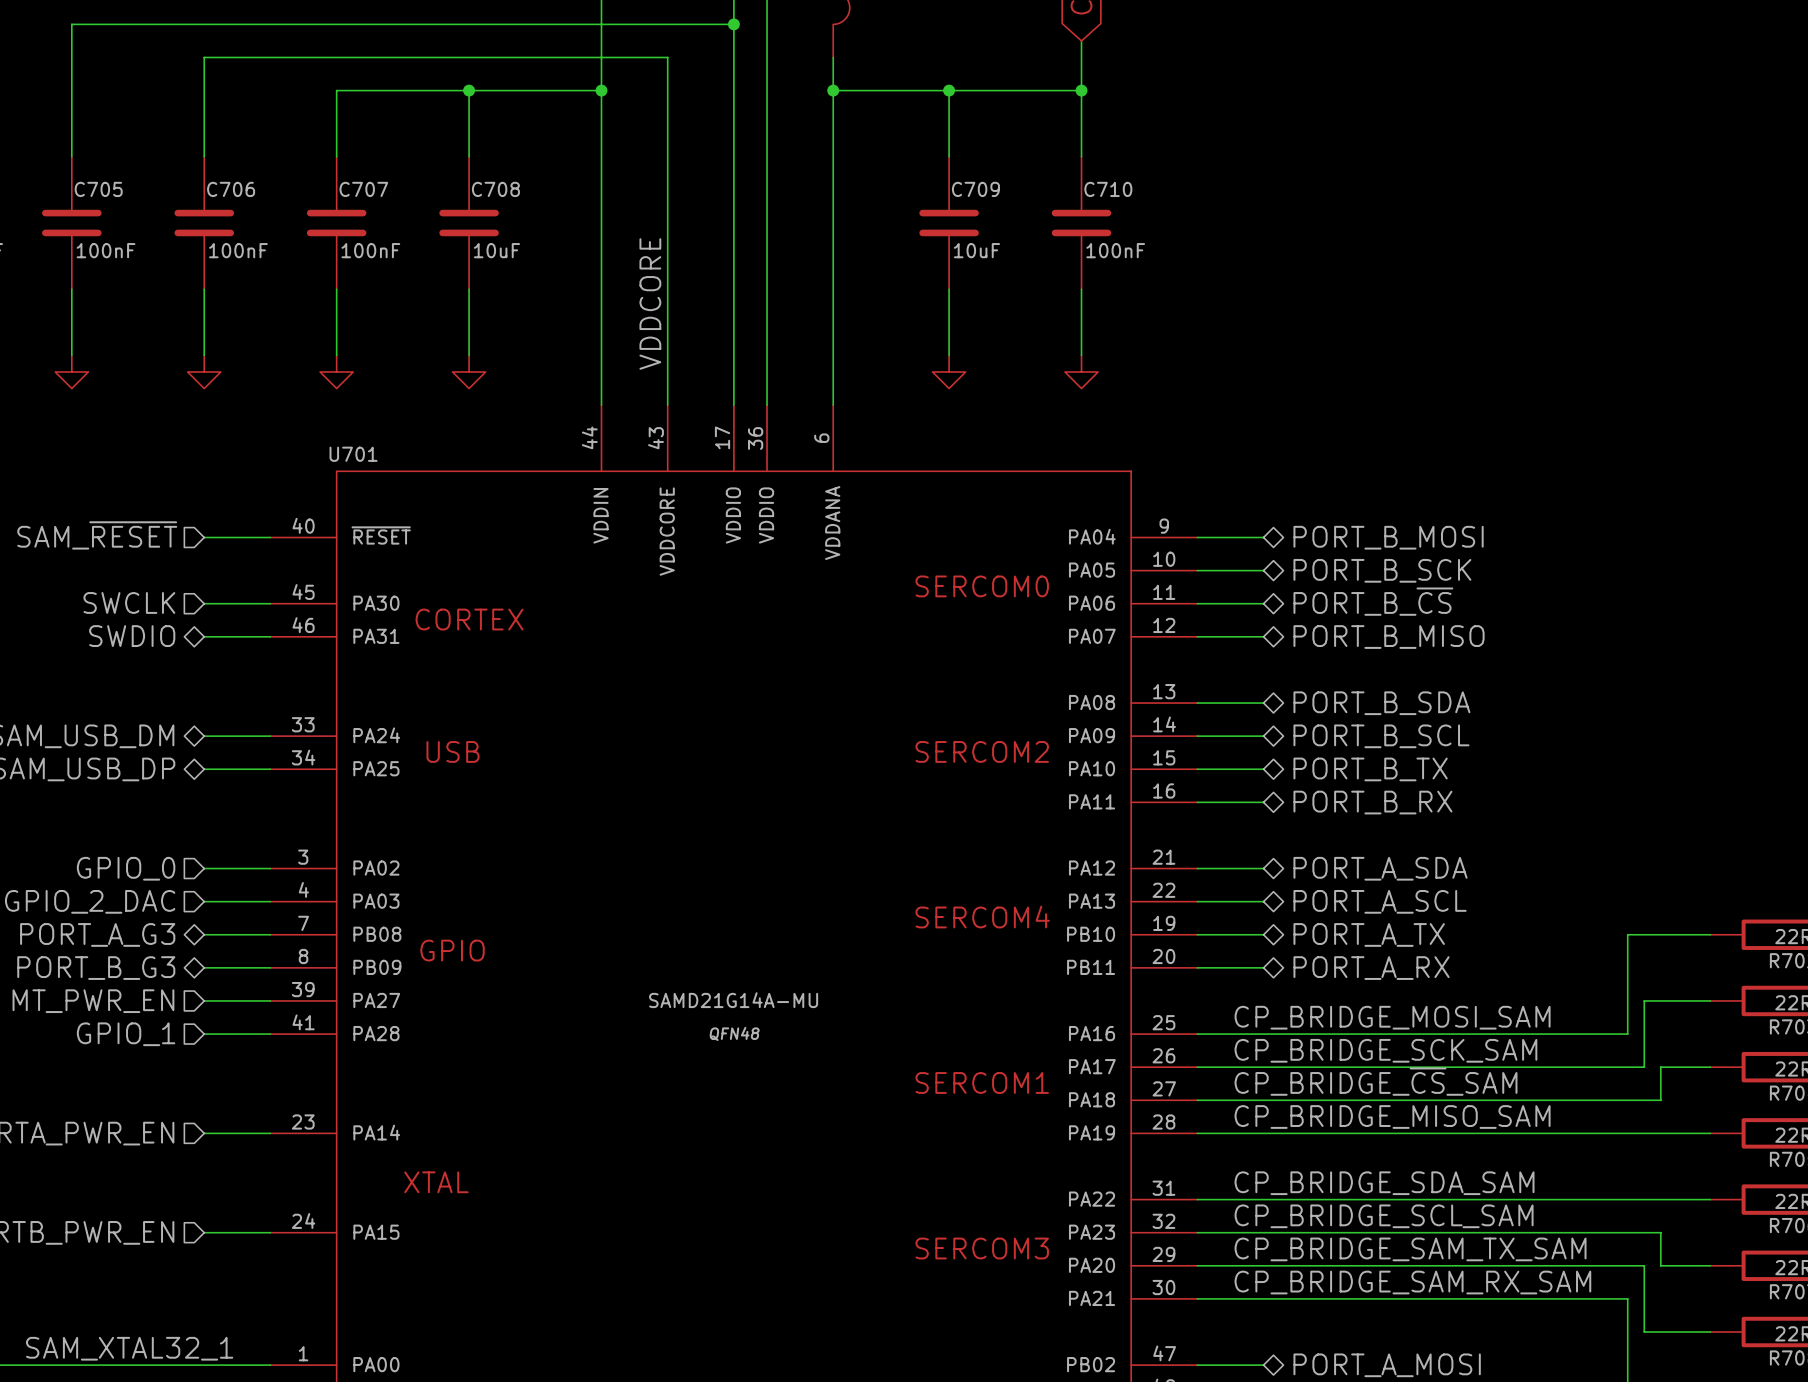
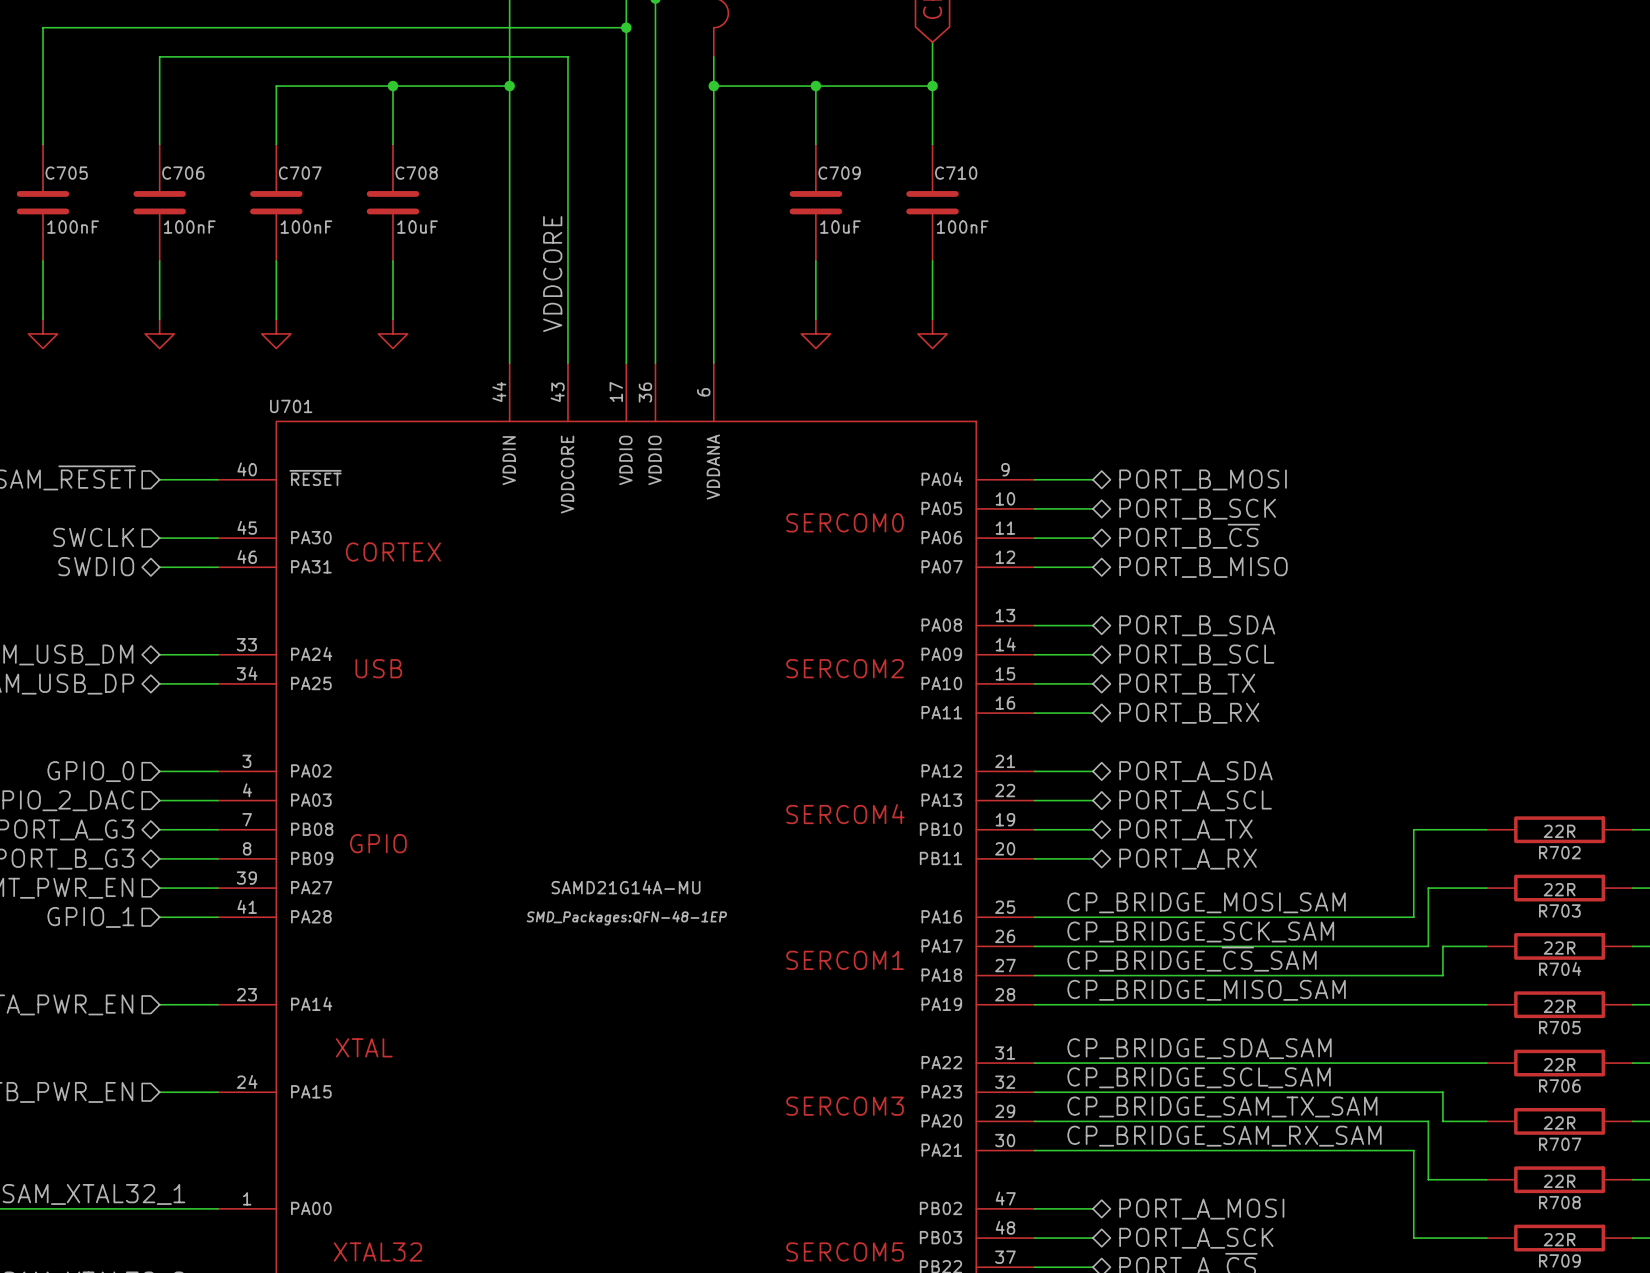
U701 text: QFN48 (734, 1033) -> SMD_Packages:QFN-48-1EP (626, 918)

